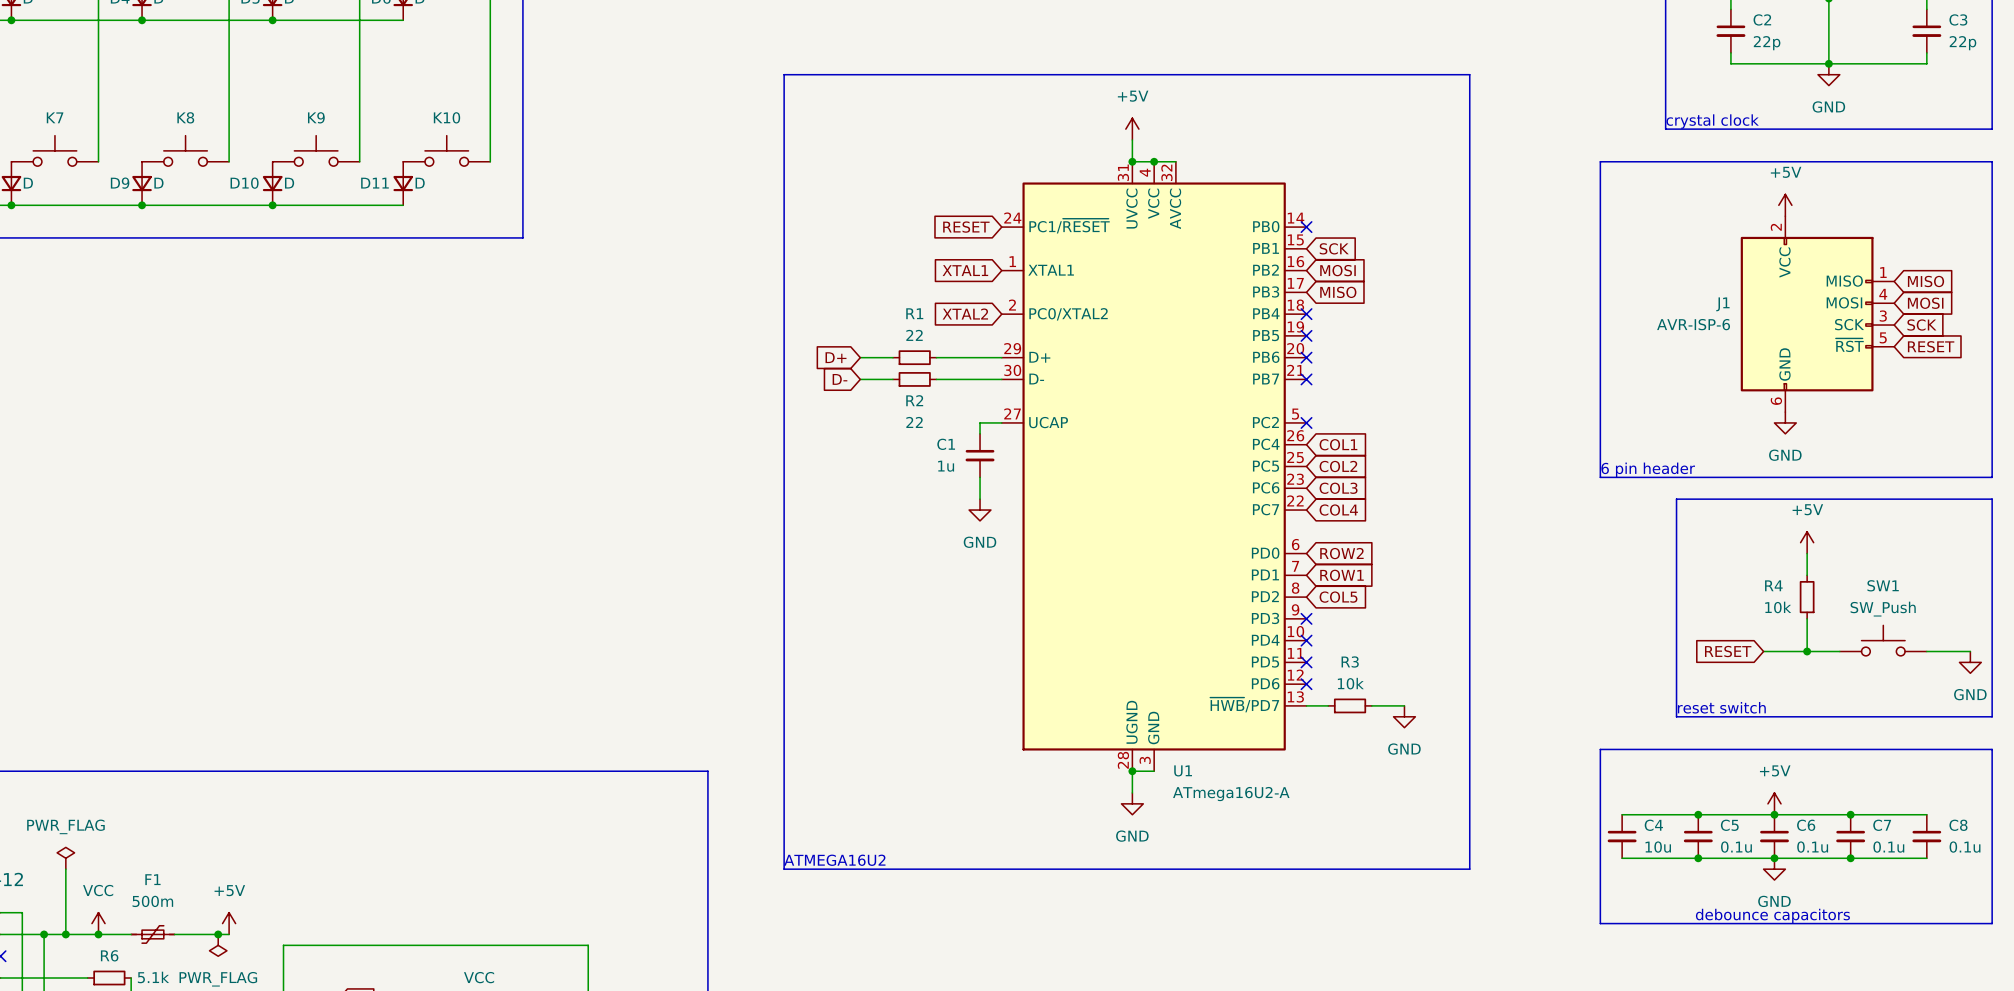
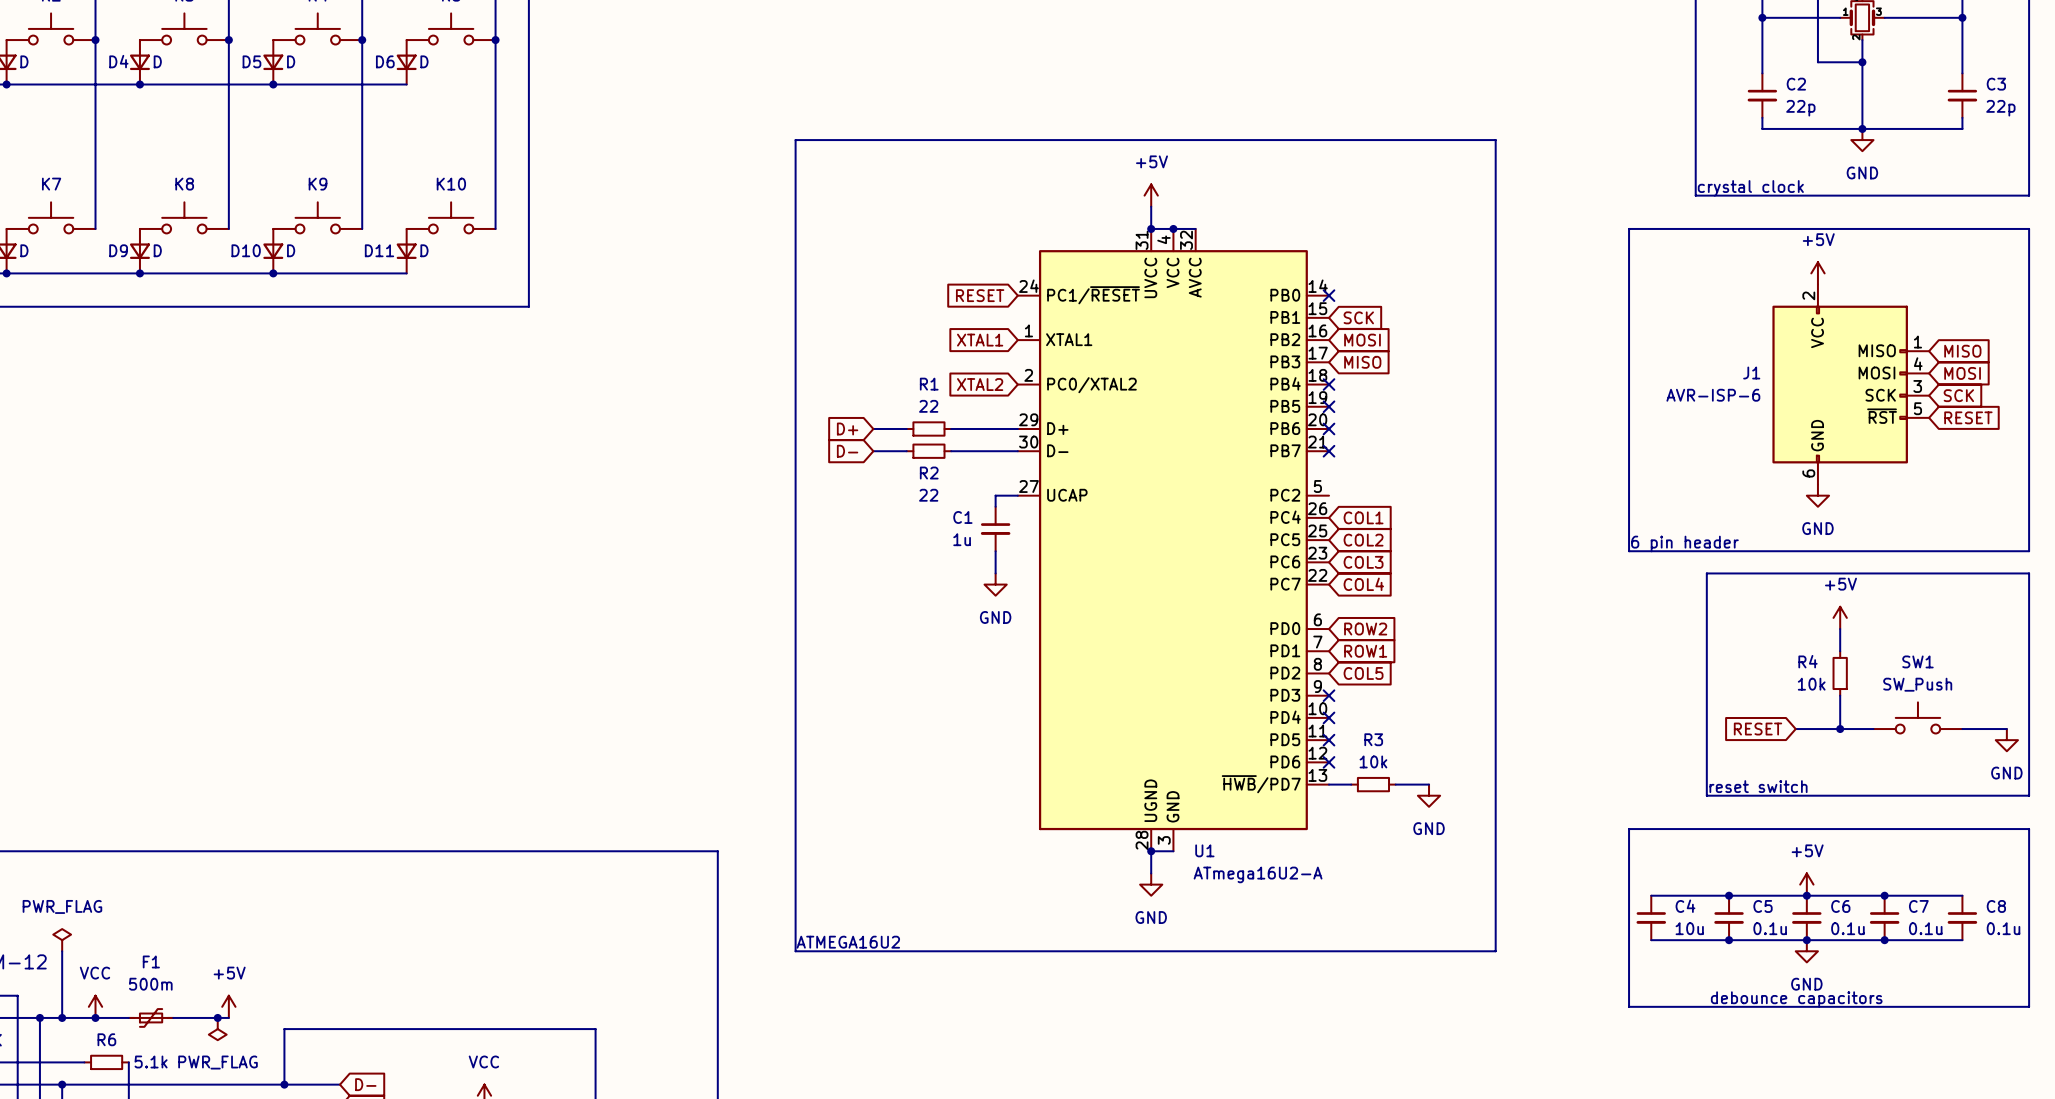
no-connect mark: (1306, 422) -> none

